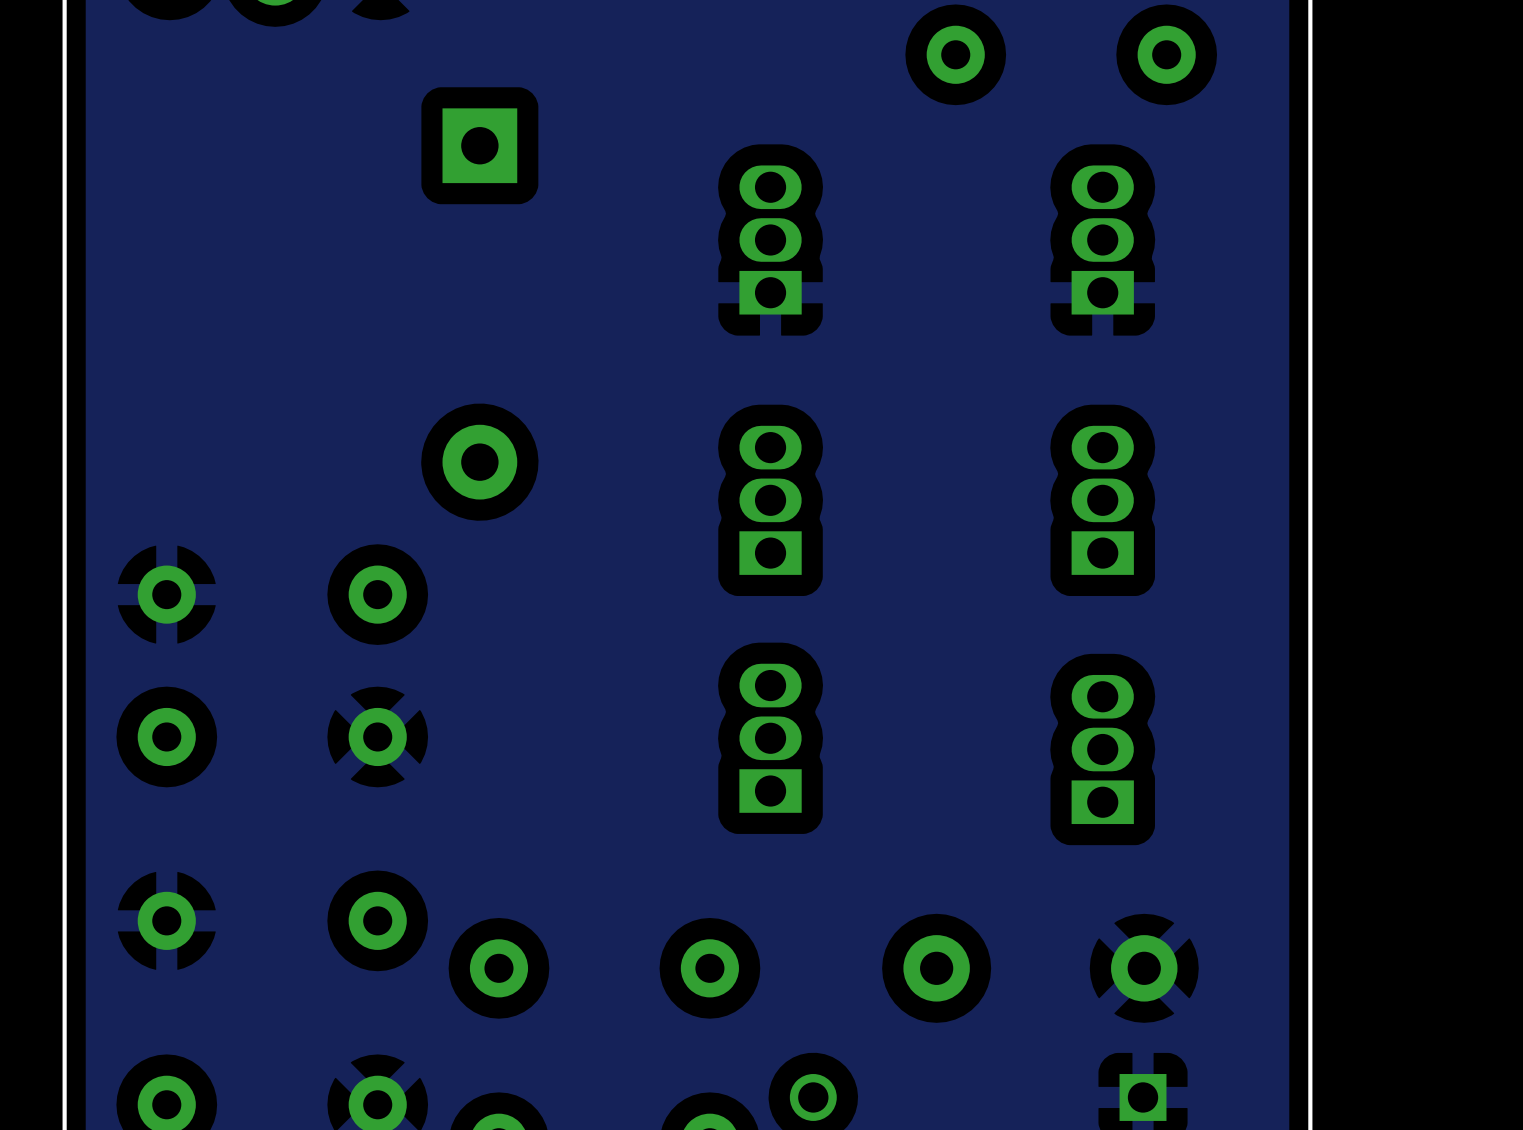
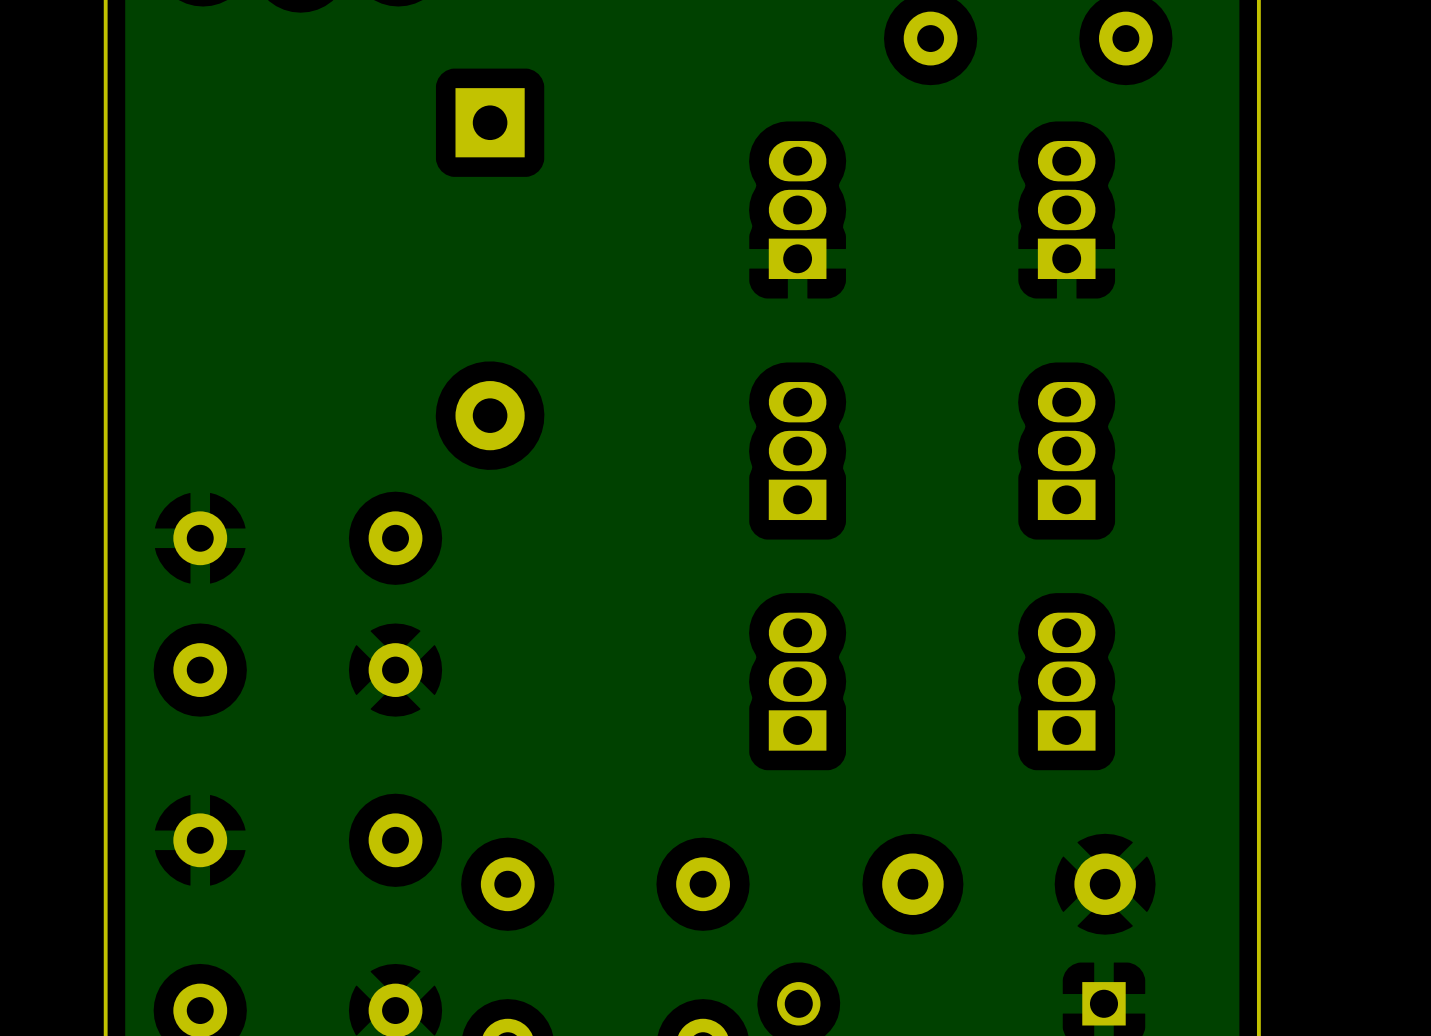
part position: (770, 239) -> (797, 209)
part position: (770, 500) -> (797, 451)
part position: (770, 738) -> (797, 681)

